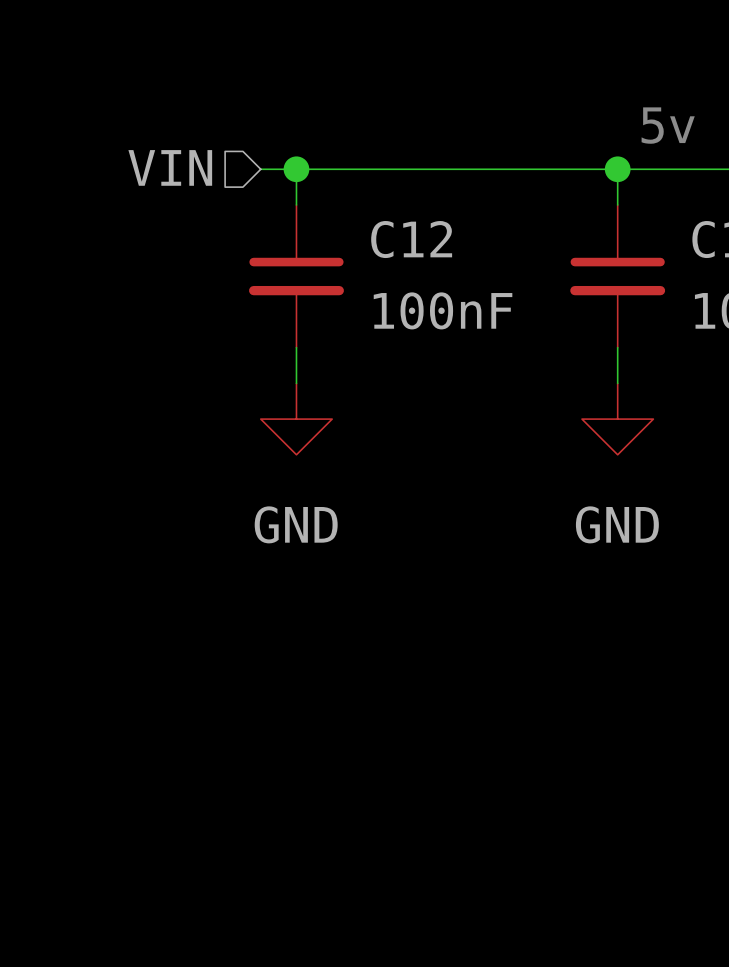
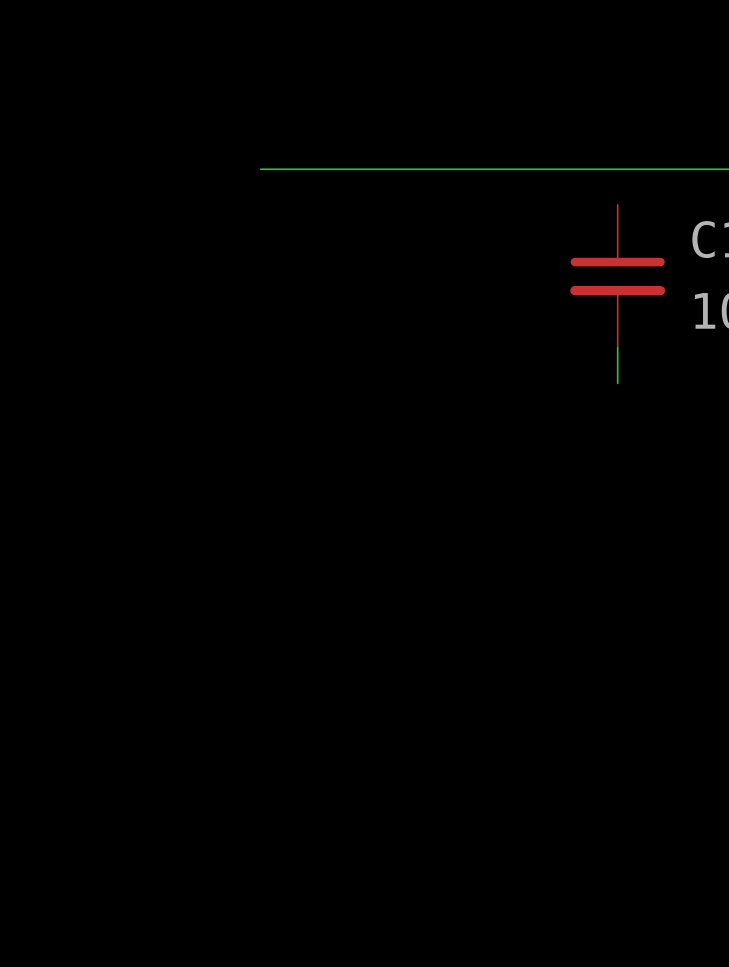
text: 5v (668, 125) -> none
hierarchical label: VIN (170, 167) -> none
wire: (296, 169) (296, 204) -> none
junction: (296, 169) -> none
wire: (617, 169) (617, 204) -> none
junction: (617, 169) -> none
C12: 100nF (296, 276) -> none
wire: (296, 347) (296, 383) -> none
power symbol: GND (296, 419) -> none
power symbol: GND (617, 419) -> none

